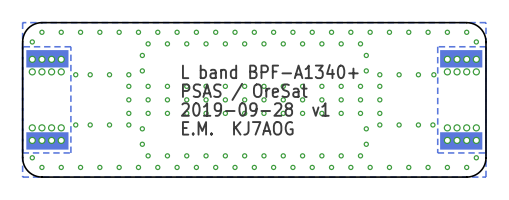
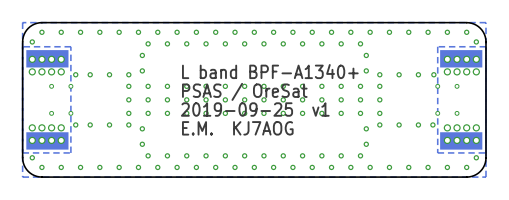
via: none -> (51, 86)
via: none -> (70, 86)
via: none -> (437, 86)
via: none -> (457, 86)
text: 2019-09-28 v1 (255, 109) -> 2019-09-25 v1 (255, 109)
via: none -> (51, 113)
via: none -> (70, 113)
via: none -> (437, 113)
via: none -> (457, 113)

